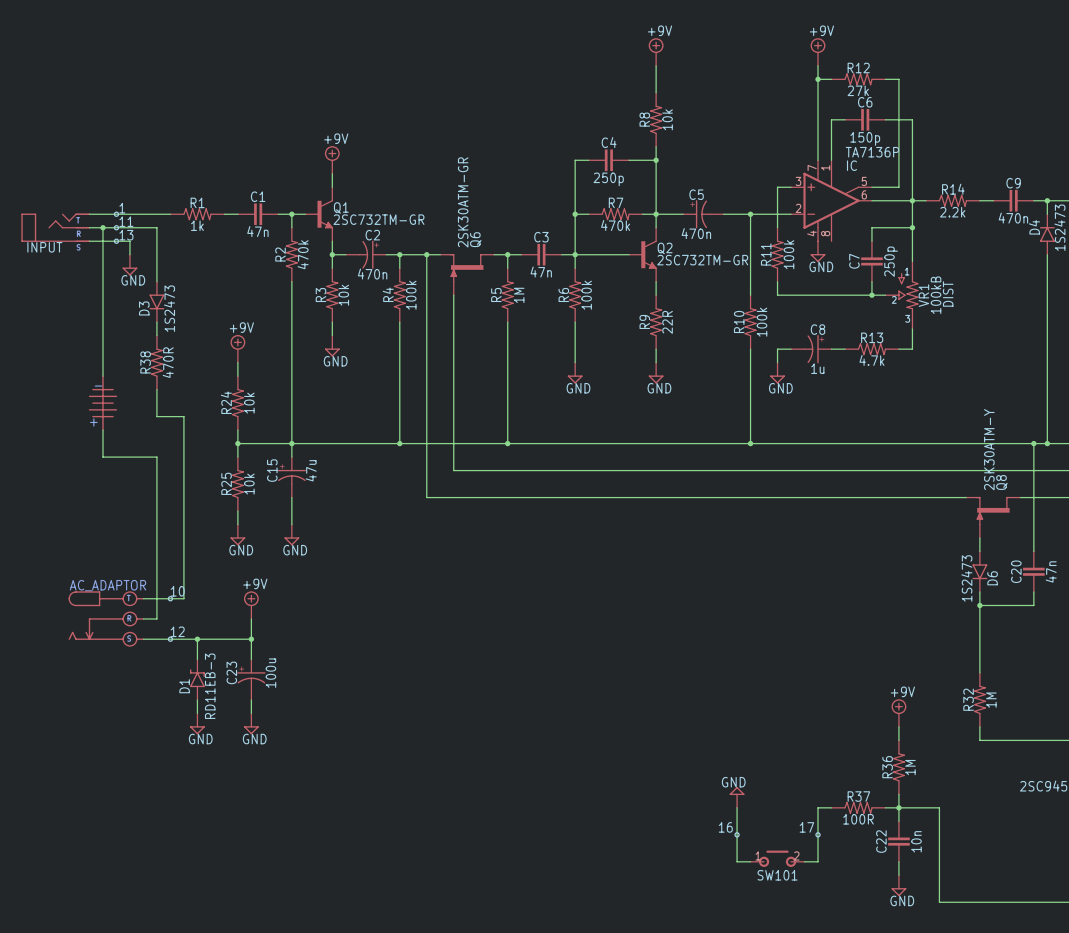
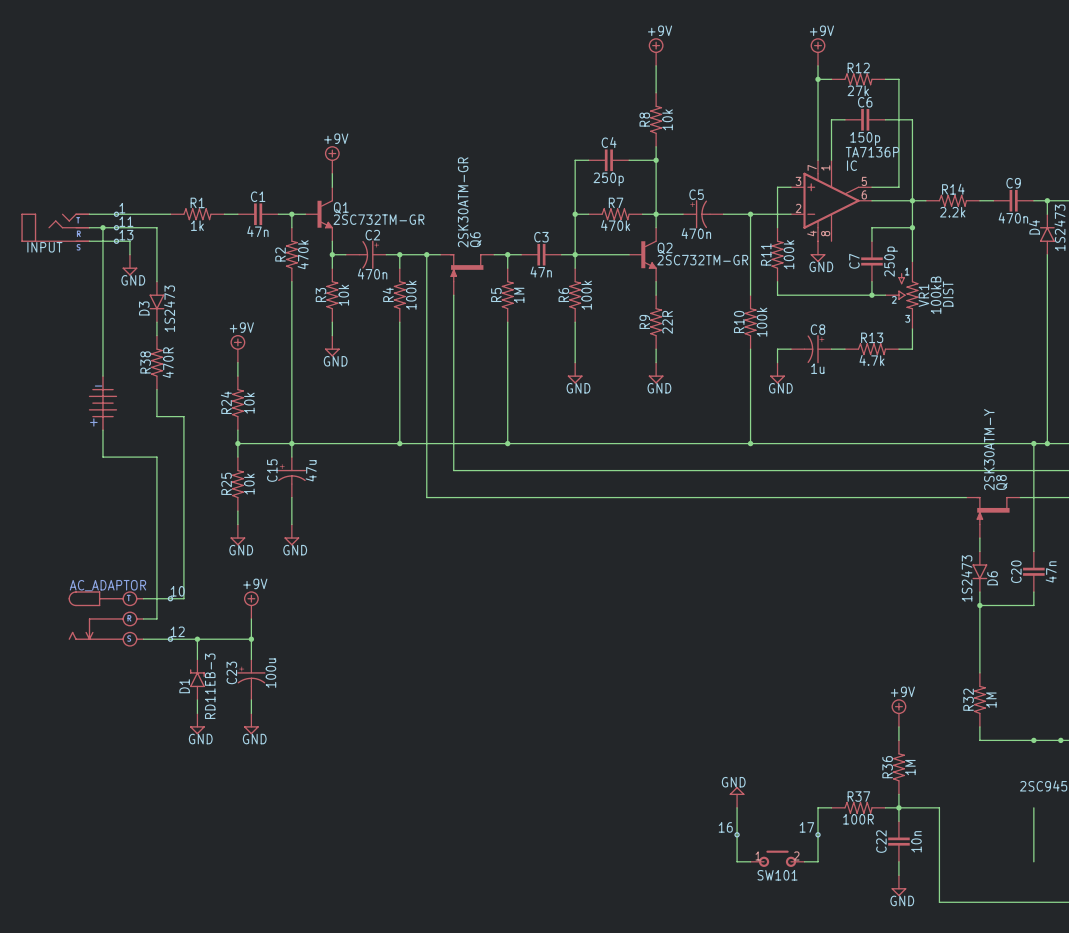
junction: none -> (1033, 740)
junction: none -> (1060, 740)
wire: none -> (1033, 807) (1033, 861)

